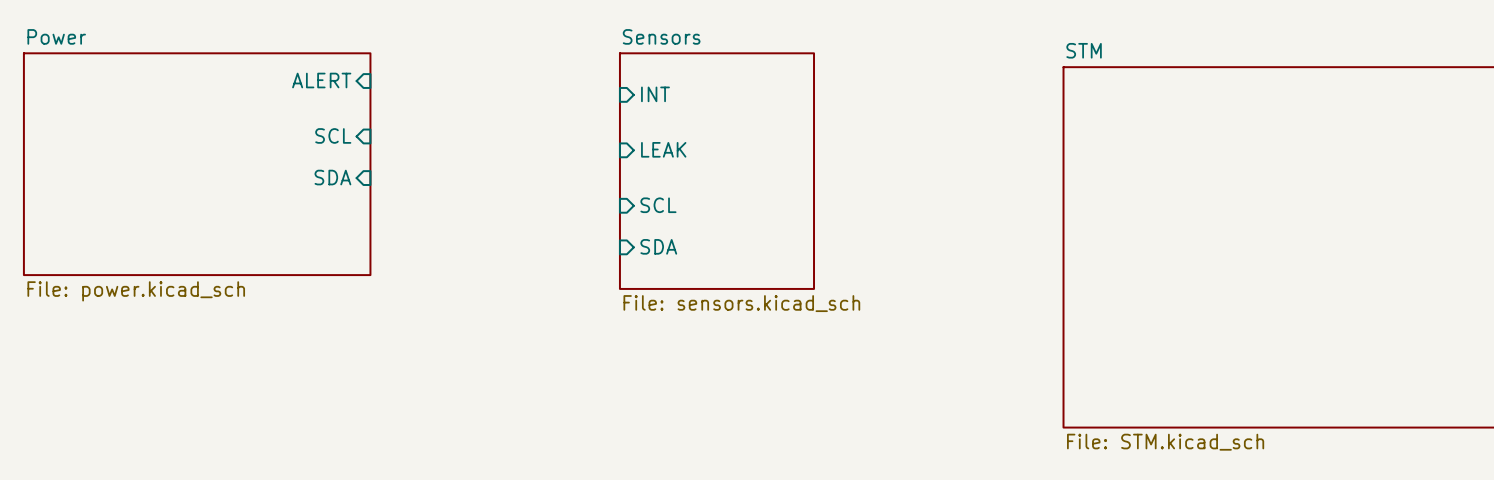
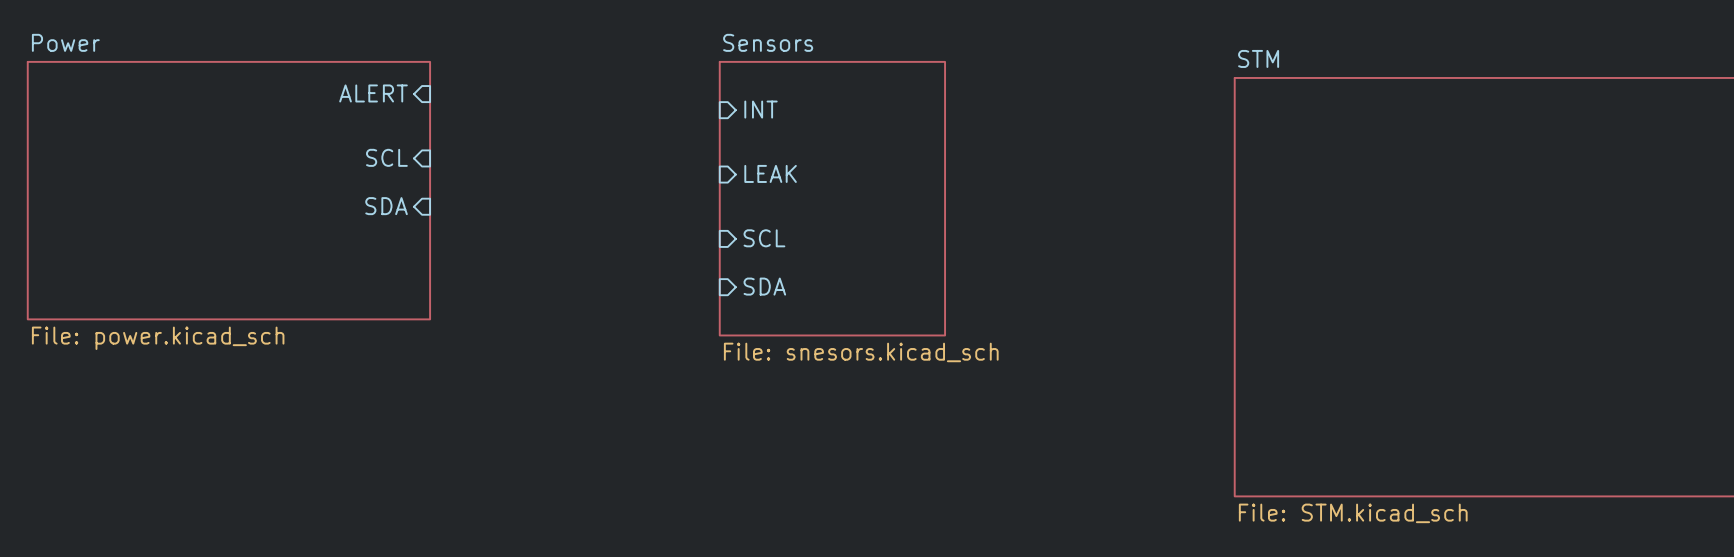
sheet Sensors value: File: sensors.kicad_sch (741, 303) -> File: snesors.kicad_sch (861, 352)

